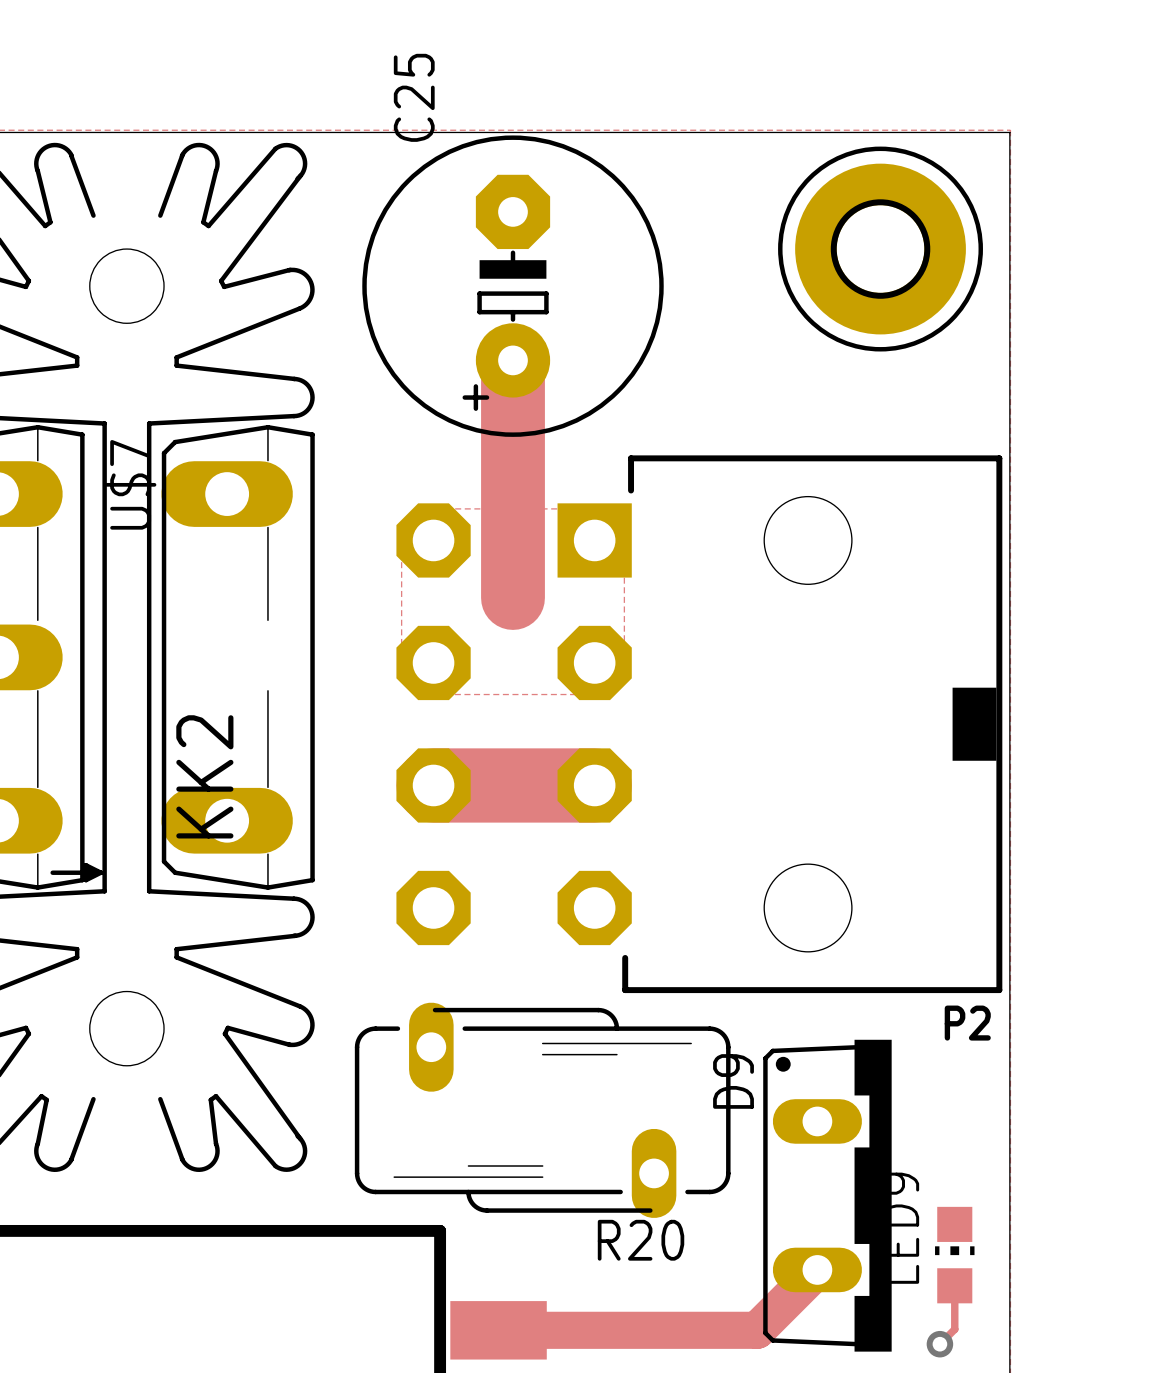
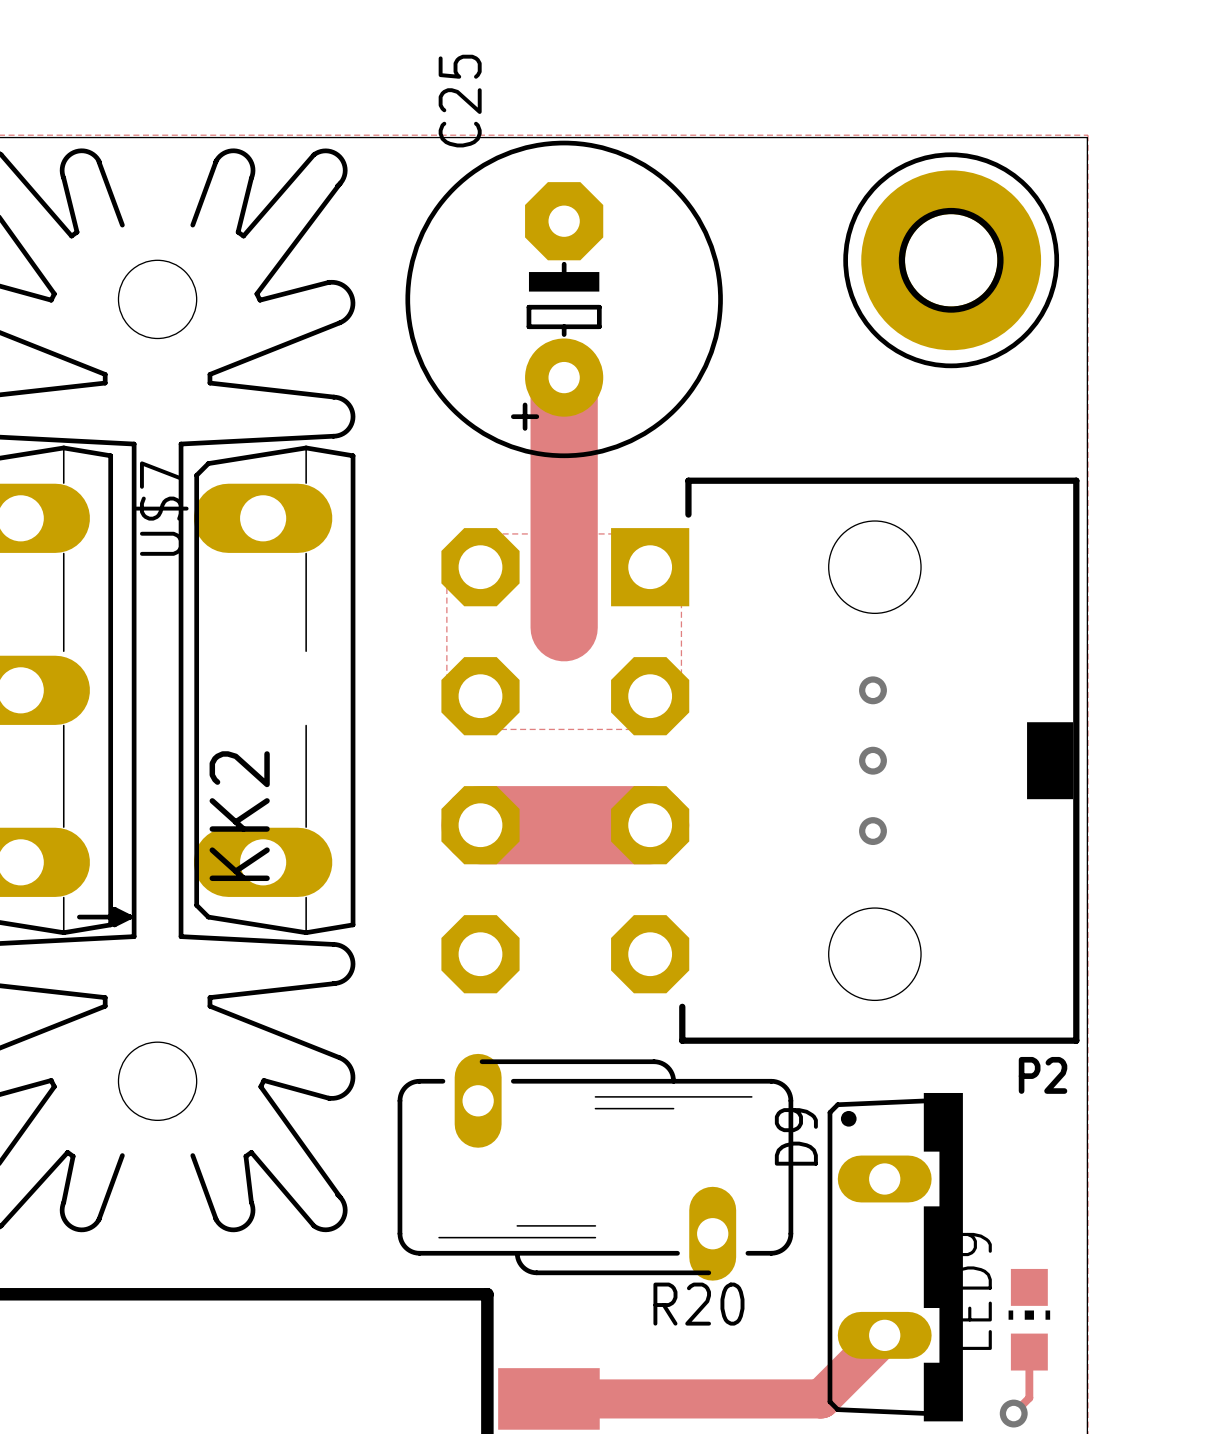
via: none -> (872, 690)
via: none -> (872, 760)
via: none -> (872, 831)

